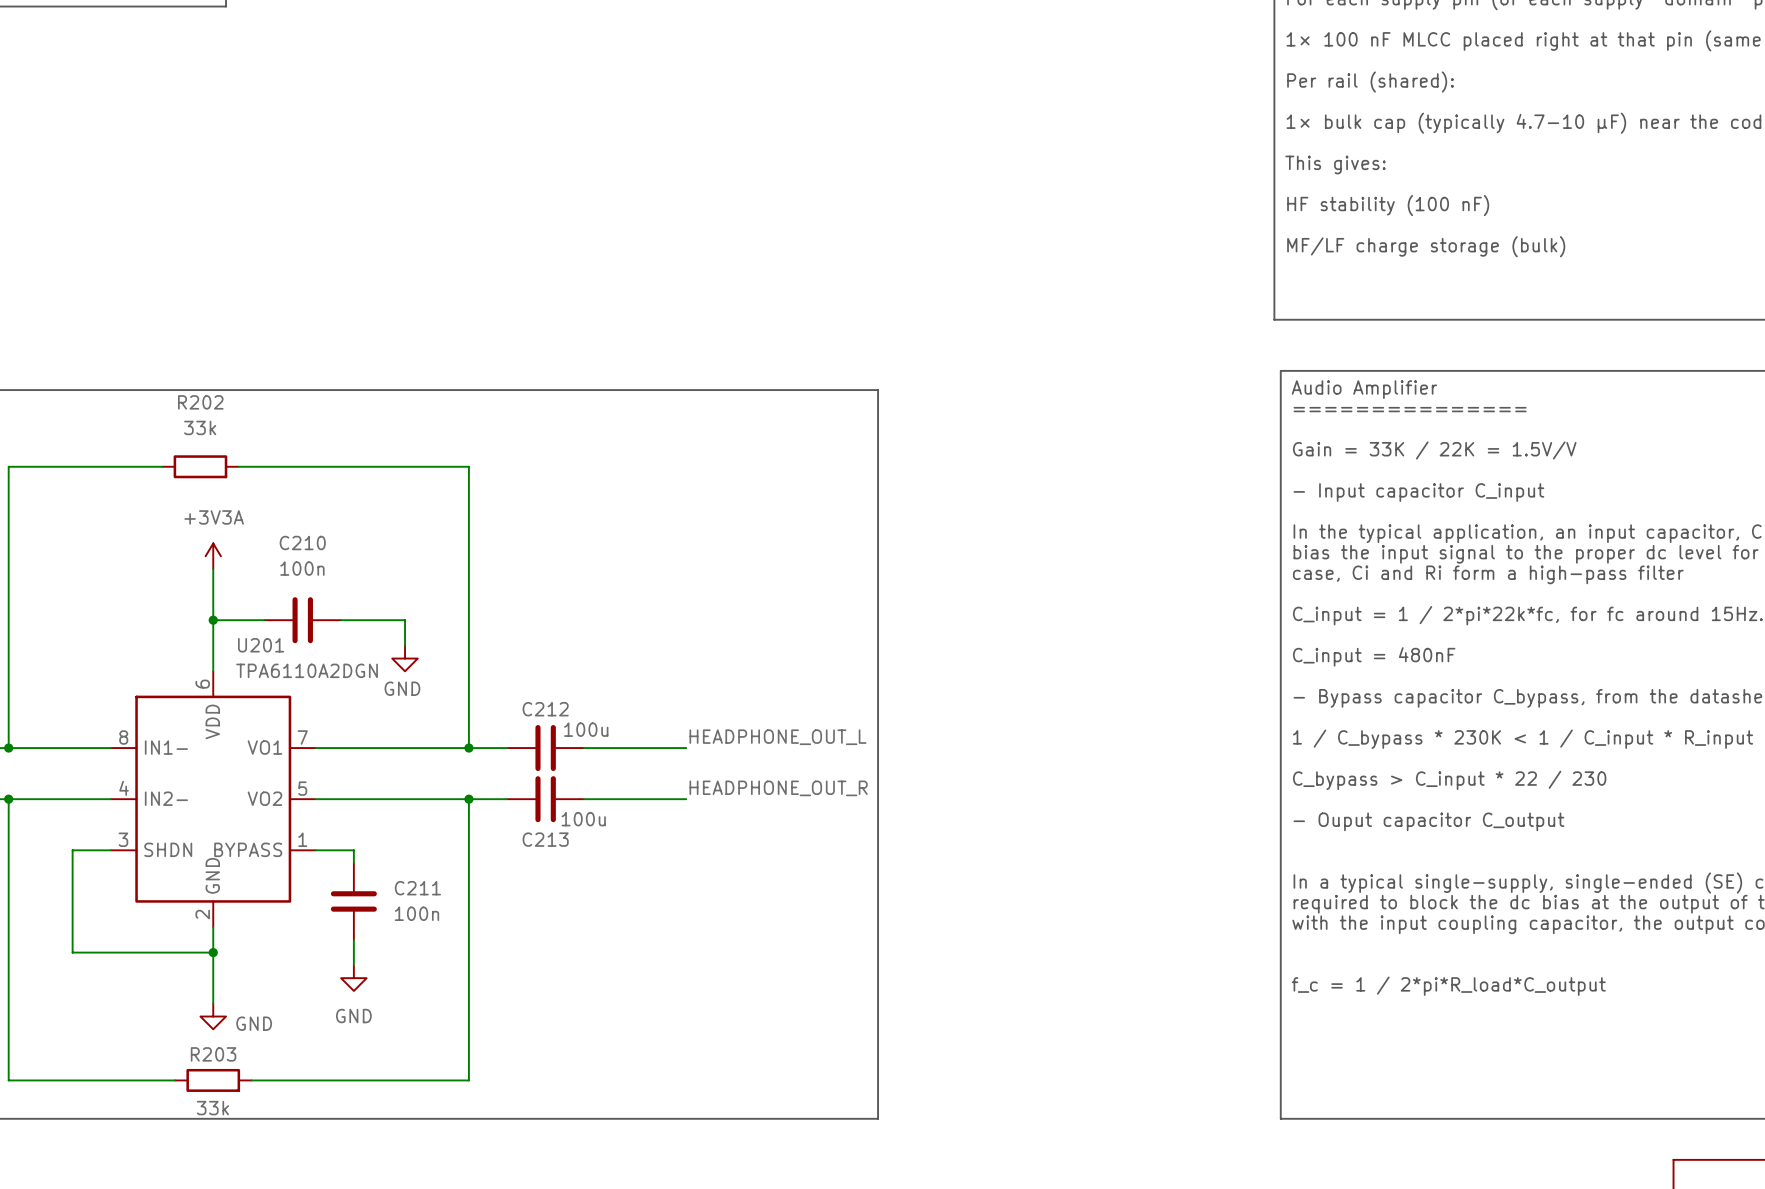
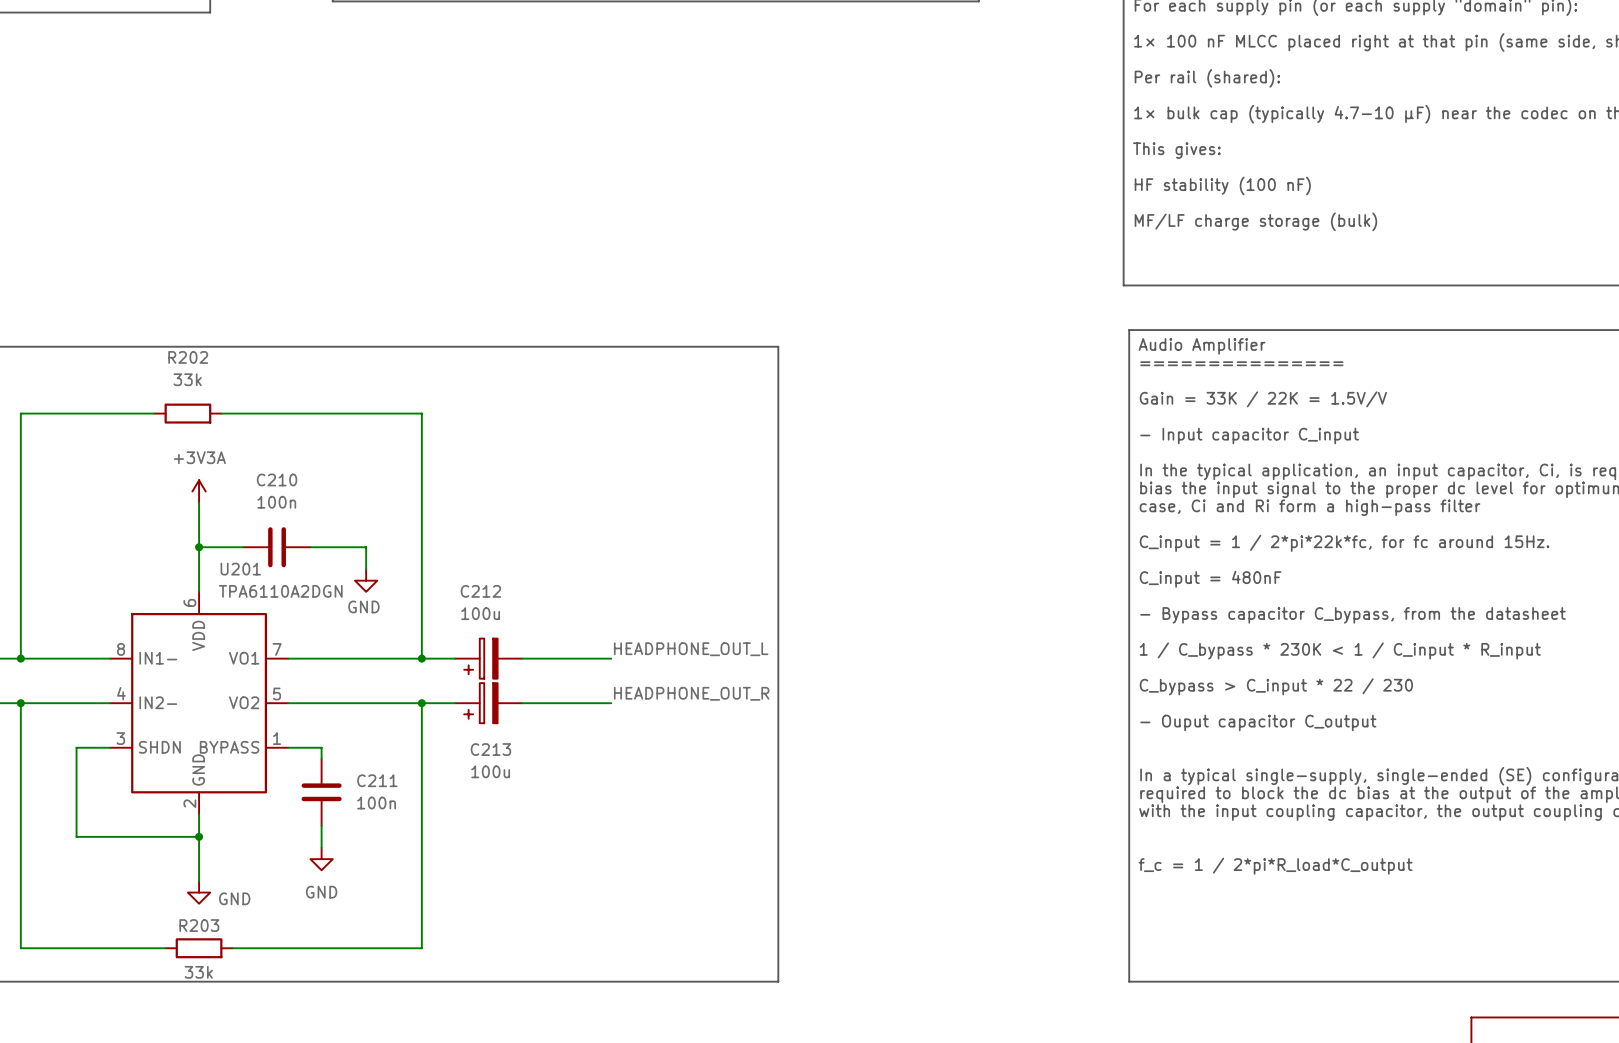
C212 name position: C212 (545, 709) -> C212 (480, 591)
C212 symbol: [507, 725, 585, 772] -> [455, 638, 523, 679]
C212 value position: 100u (586, 729) -> 100u (480, 613)
C213 symbol: [507, 776, 585, 823] -> [455, 683, 523, 724]
C213 value position: 100u (583, 819) -> 100u (490, 771)

